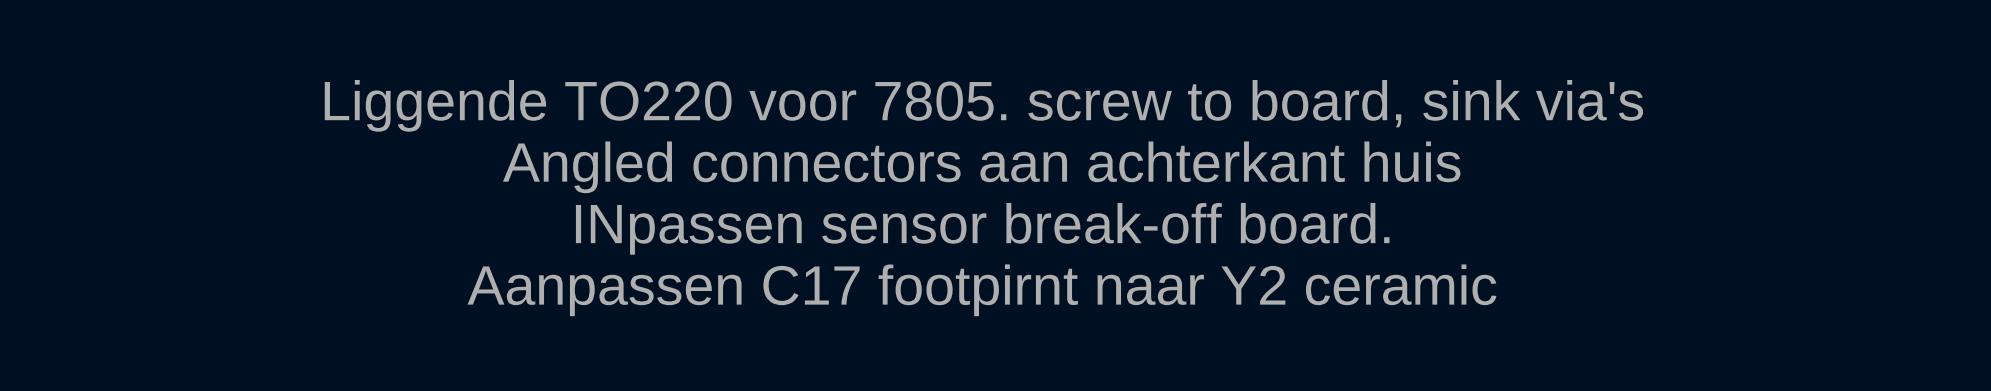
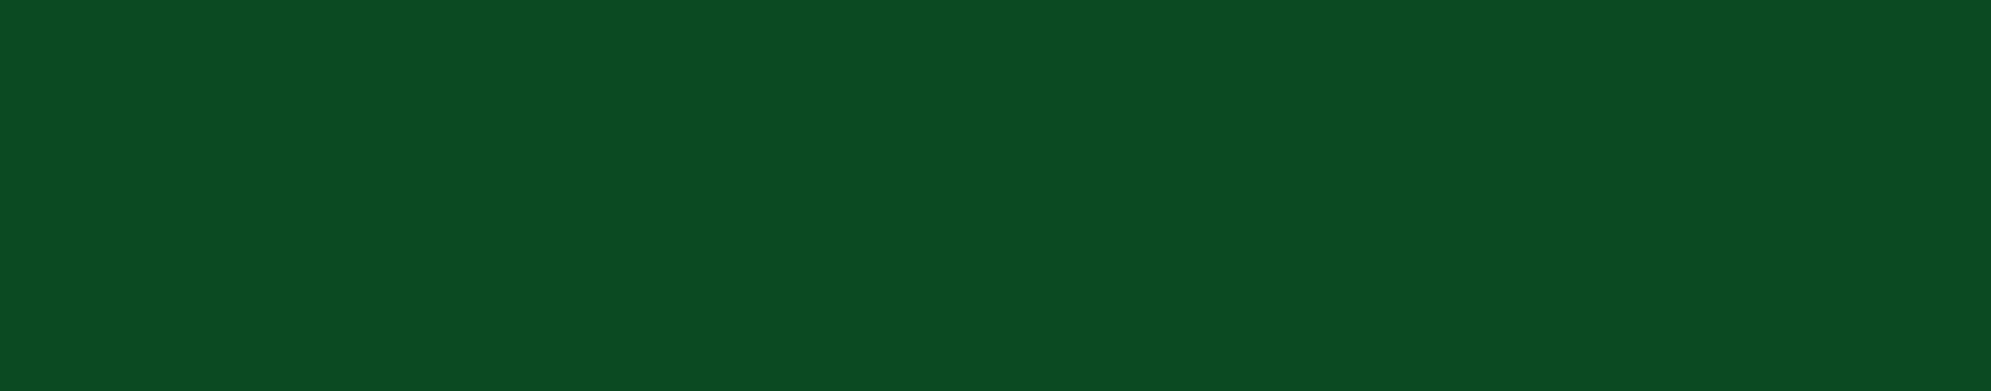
text: Liggende TO220 voor 7805. screw to board, sink via's (983, 105) -> none
text: Angled connectors aan achterkant huis (981, 167) -> none
text: INpassen sensor break-off board. (982, 228) -> none
text: Aanpassen C17 footpirnt naar Y2 ceramic (981, 290) -> none

